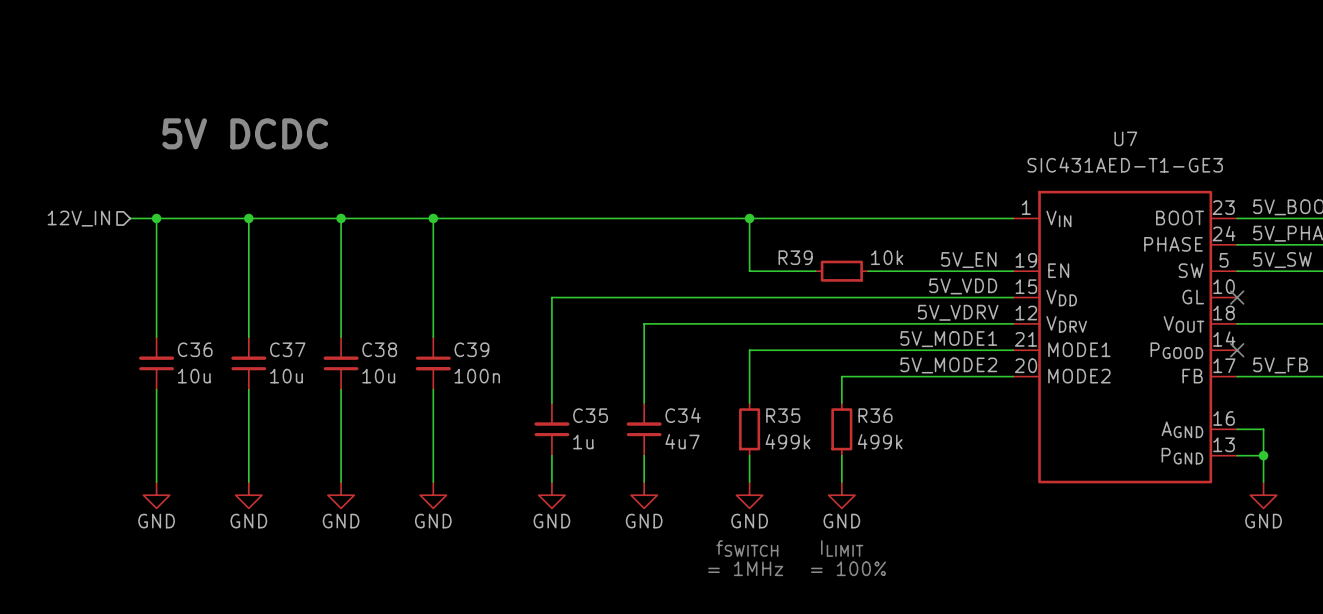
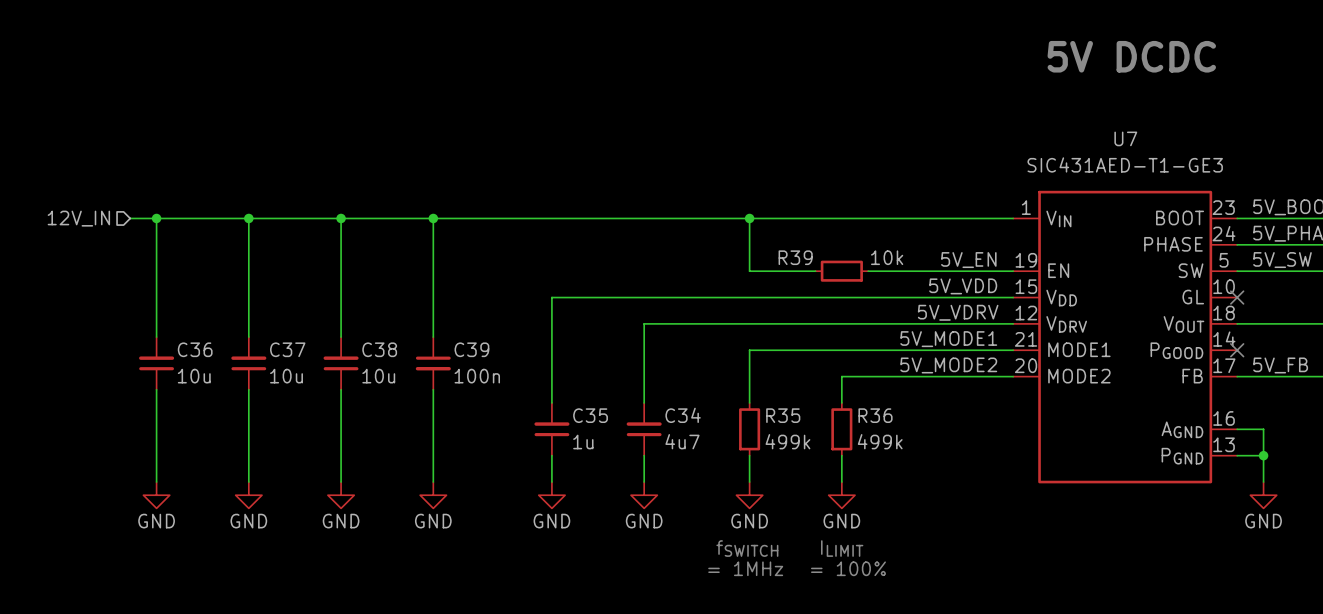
text: none -> 5V DCDC (1131, 56)
text: 5V DCDC (245, 133) -> none

